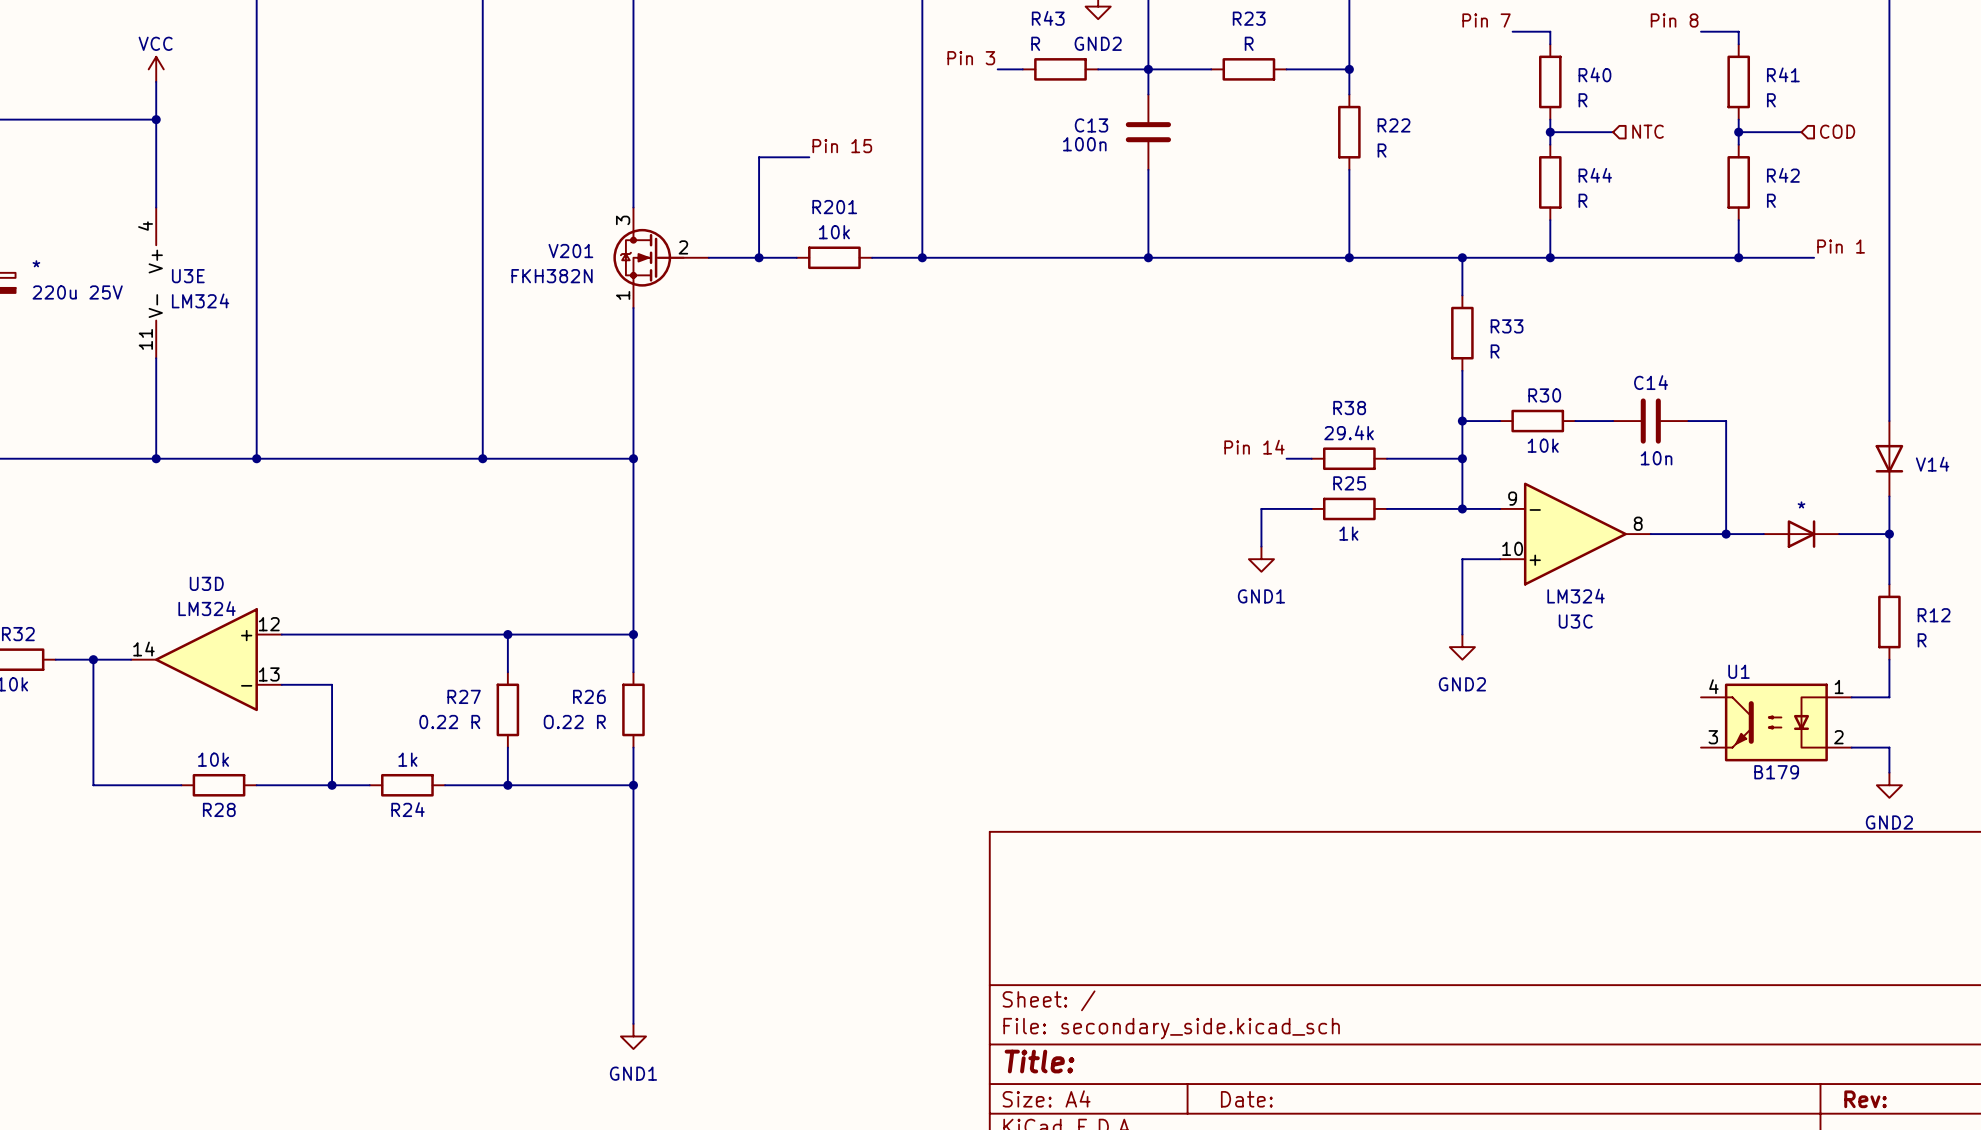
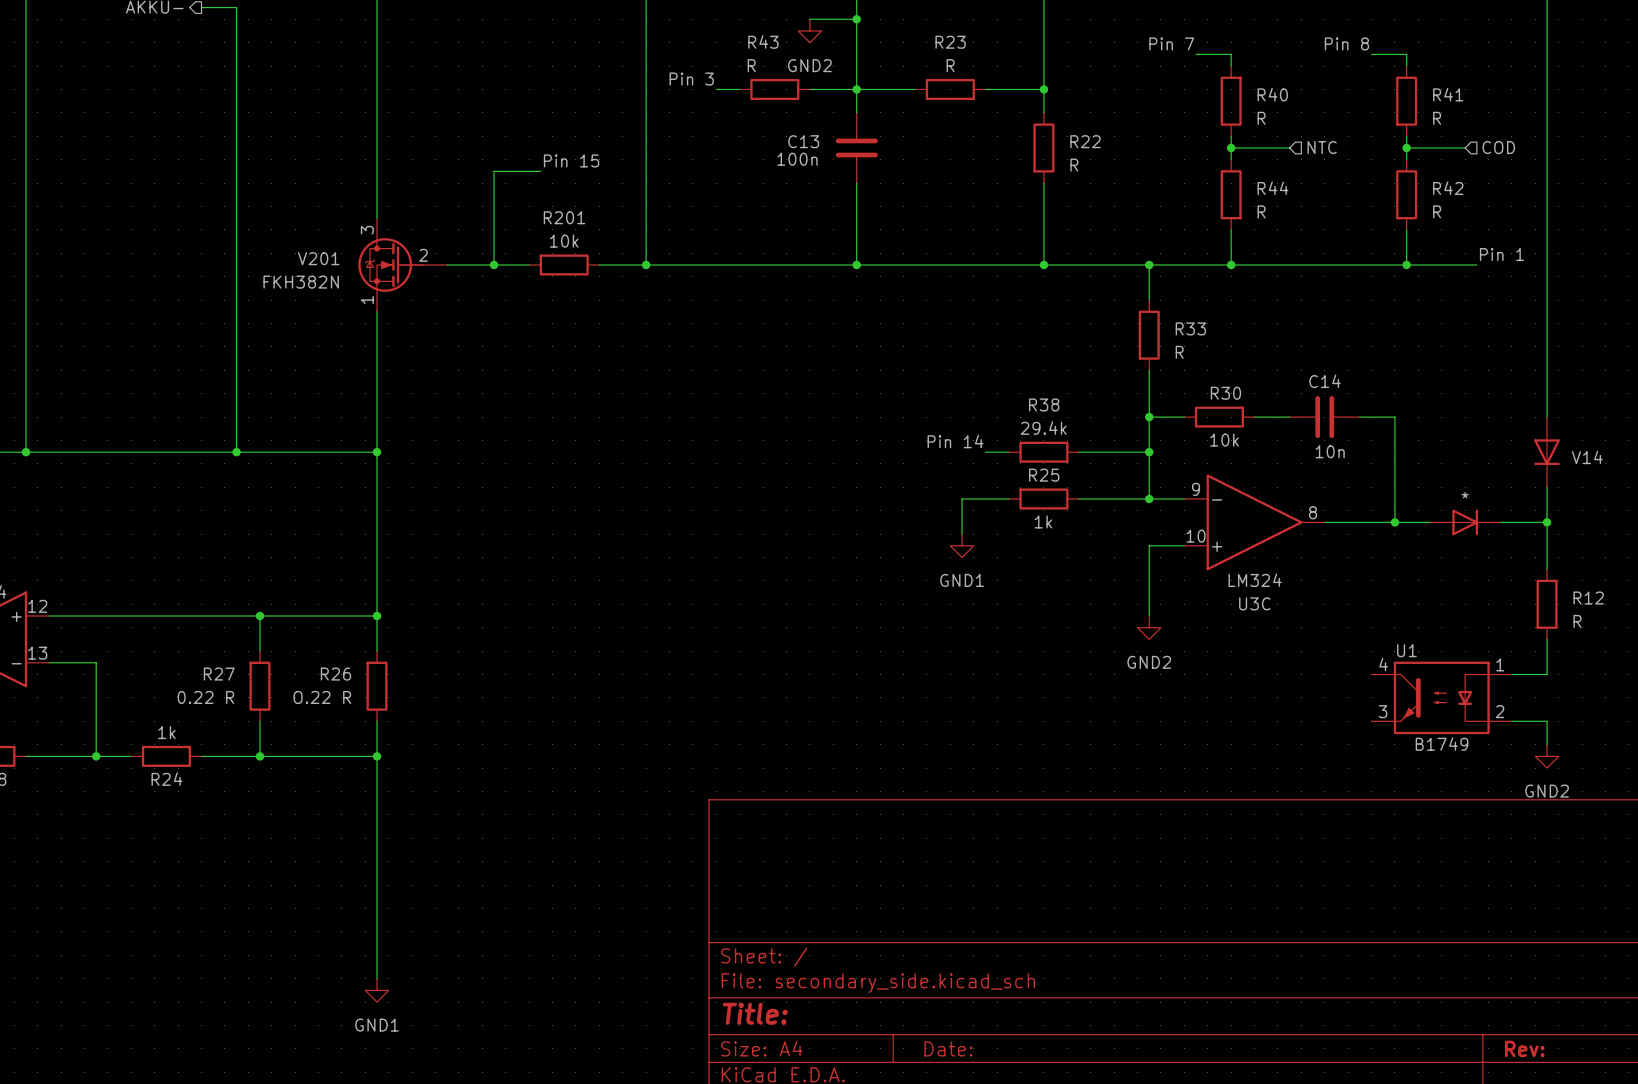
U1 value: B179 (1776, 772) -> B1749 (1442, 743)

